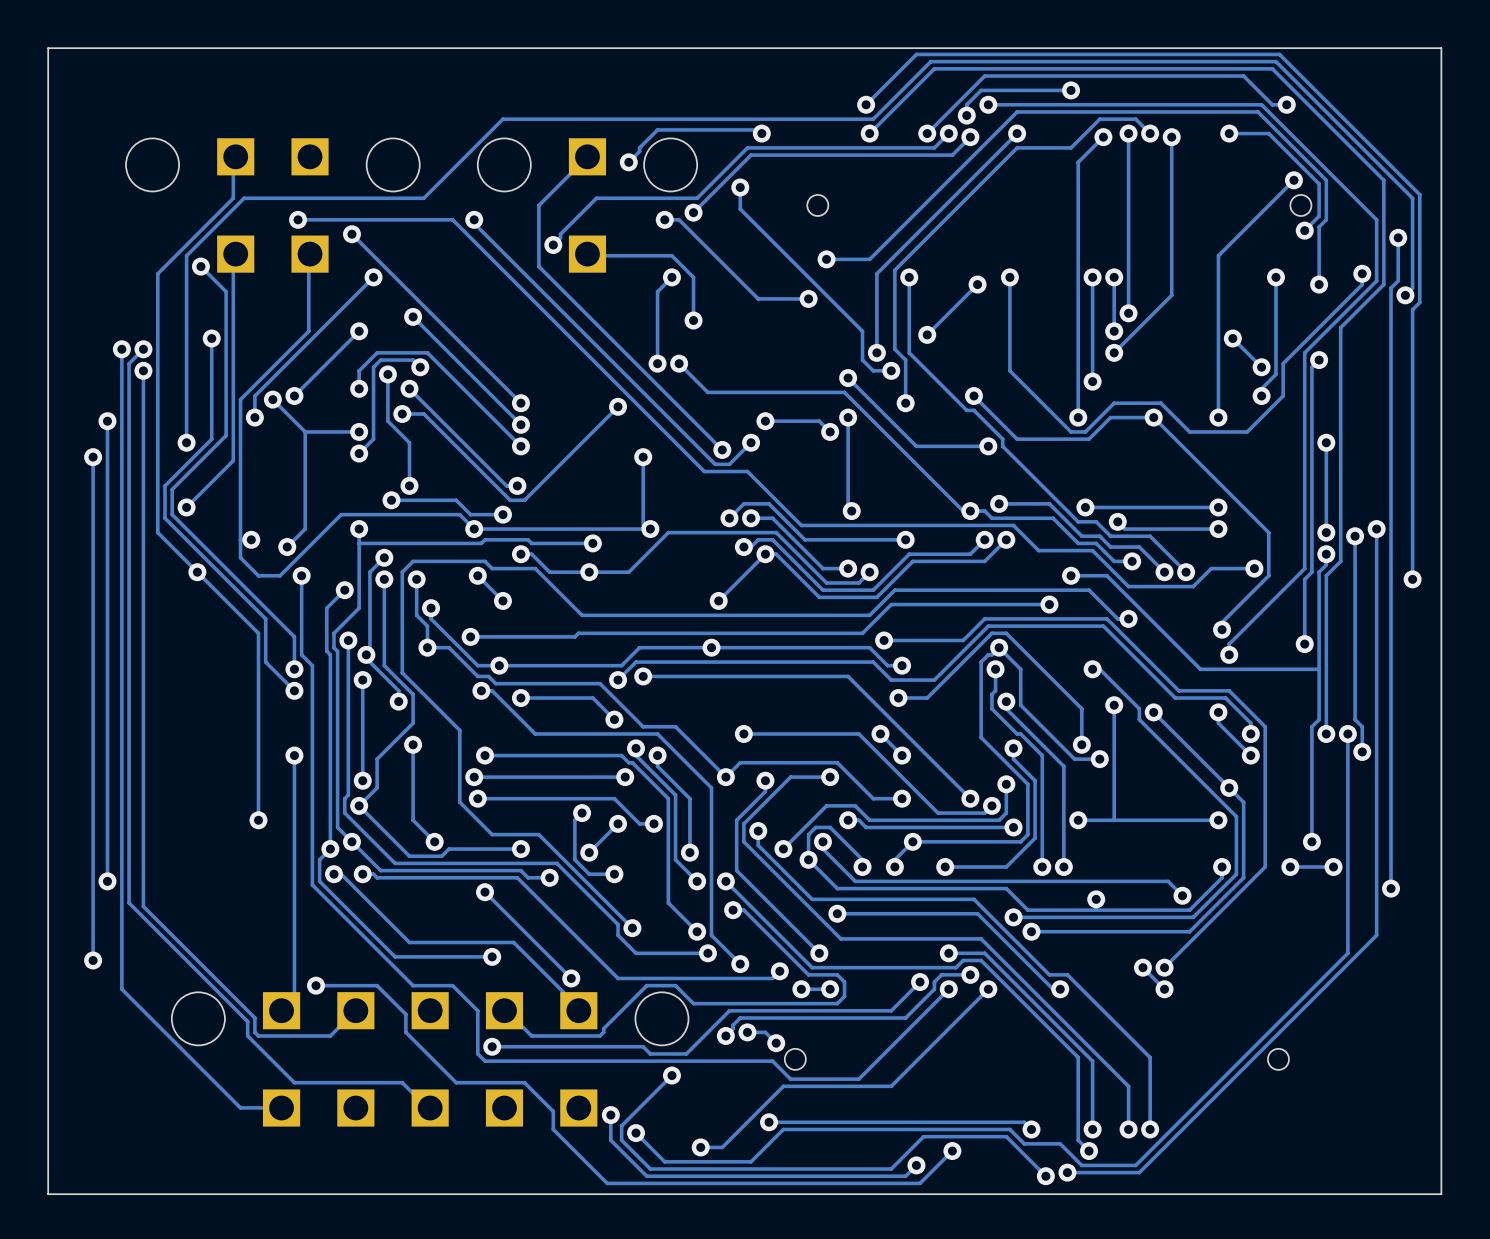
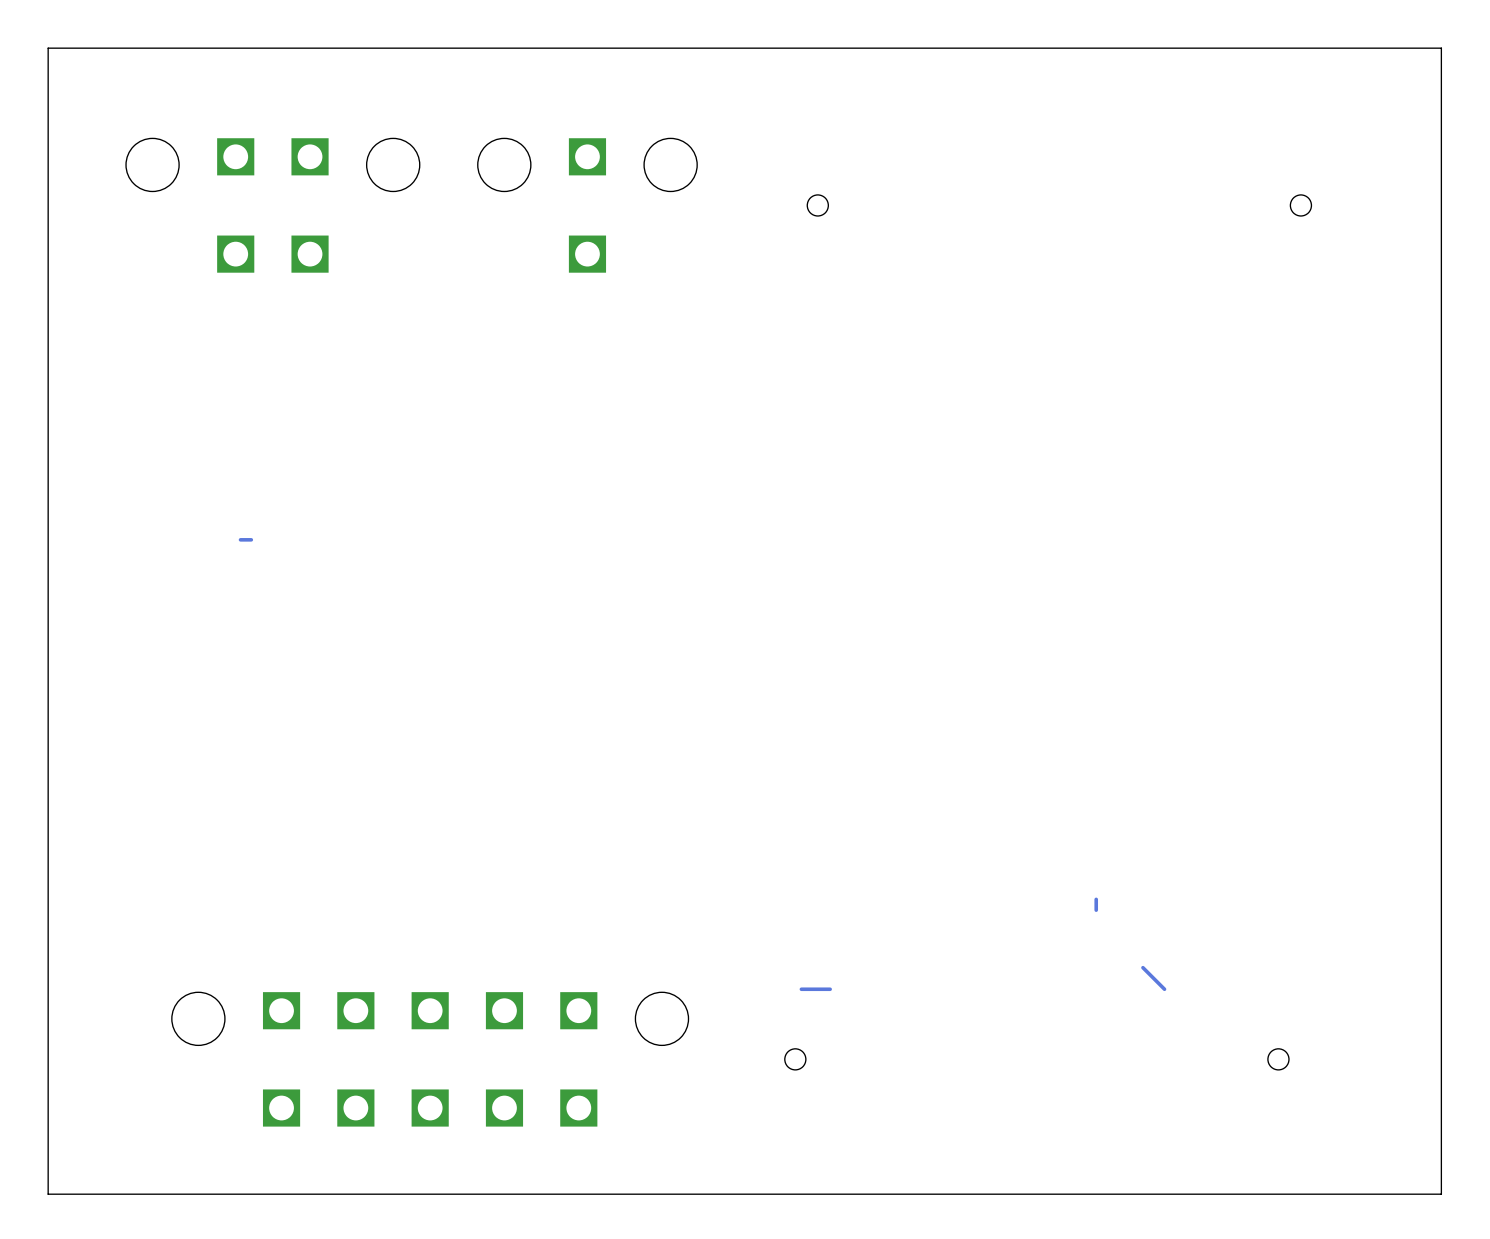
track: (1071, 90) (981, 90) (966, 104) (966, 115) -> none
via: (1071, 90) -> none
track: (866, 104) (916, 54) (1279, 54) (1419, 194) (1419, 302) (1412, 309) (1412, 579) -> none
via: (866, 104) -> none
track: (988, 104) (1261, 104) (1376, 219) (1376, 280) (1304, 352) (1304, 568) (1229, 644) (1229, 654) -> none
via: (988, 104) -> none
track: (1286, 104) (1272, 104) (1243, 76) (984, 76) (927, 133) -> none
via: (1286, 104) -> none
via: (966, 115) -> none
track: (761, 133) (758, 129) (657, 129) (628, 162) -> none
via: (761, 133) -> none
track: (869, 133) (934, 68) (1272, 68) (1383, 180) (1383, 284) (1340, 327) (1340, 561) (1326, 575) (1326, 733) -> none
via: (869, 133) -> none
via: (927, 133) -> none
track: (948, 133) (934, 147) (747, 147) (697, 198) (596, 198) (560, 234) (560, 237) (553, 245) -> none
via: (948, 133) -> none
track: (1017, 133) (876, 273) (876, 352) -> none
via: (1017, 133) -> none
track: (1128, 133) (1128, 313) -> none
via: (1128, 133) -> none
track: (1150, 133) (1135, 119) (1099, 119) (1071, 147) (1017, 147) (894, 270) (894, 349) (905, 360) (905, 403) -> none
via: (1150, 133) -> none
track: (1229, 133) (1268, 133) (1319, 183) (1319, 216) (1304, 230) -> none
via: (1229, 133) -> none
track: (970, 137) (952, 155) (751, 155) (693, 212) -> none
via: (970, 137) -> none
track: (1103, 137) (1078, 162) (1078, 417) -> none
via: (1103, 137) -> none
track: (1171, 137) (1171, 295) (1114, 352) -> none
via: (1171, 137) -> none
track: (235, 156) (233, 158) (233, 198) (157, 273) (157, 532) (258, 633) (258, 820) -> none
track: (587, 156) (538, 205) (538, 266) (722, 449) -> none
via: (628, 162) -> none
track: (1293, 180) (1218, 255) (1218, 417) -> none
via: (1293, 180) -> none
track: (740, 187) (740, 209) (862, 331) (862, 360) (873, 370) (891, 370) -> none
via: (740, 187) -> none
via: (693, 212) -> none
track: (298, 219) (452, 219) (704, 471) (747, 471) (801, 525) (1013, 525) (1038, 550) (1092, 550) (1128, 586) (1193, 586) (1211, 568) (1254, 568) -> none
via: (298, 219) -> none
track: (474, 219) (474, 223) (715, 464) (729, 464) (751, 442) -> none
via: (474, 219) -> none
track: (664, 219) (679, 219) (758, 298) (808, 298) -> none
via: (664, 219) -> none
via: (1304, 230) -> none
track: (351, 234) (520, 403) -> none
via: (351, 234) -> none
track: (1398, 237) (1398, 280) (1391, 288) (1391, 888) -> none
via: (1398, 237) -> none
via: (553, 245) -> none
track: (235, 254) (233, 255) (233, 460) (186, 507) -> none
track: (310, 254) (308, 331) (240, 399) (240, 557) (258, 575) (280, 575) (341, 514) (459, 514) (474, 529) (650, 529) -> none
track: (587, 254) (589, 255) (671, 255) (693, 277) (693, 320) -> none
track: (826, 259) (869, 259) (1017, 111) (1258, 111) (1326, 180) (1326, 219) (1319, 227) (1319, 284) -> none
via: (826, 259) -> none
track: (200, 266) (226, 291) (226, 435) (172, 489) (172, 514) (294, 636) (294, 669) -> none
via: (200, 266) -> none
track: (1362, 273) (1362, 284) (1283, 363) (1283, 396) (1247, 431) (1189, 431) (1160, 403) (1114, 403) (1085, 431) (1071, 431) (1009, 370) (1009, 277) -> none
via: (1362, 273) -> none
track: (373, 277) (254, 396) (254, 417) -> none
via: (373, 277) -> none
track: (671, 277) (657, 291) (657, 363) -> none
via: (671, 277) -> none
track: (909, 277) (909, 352) (966, 410) (973, 410) (1002, 439) (1002, 446) (1078, 521) (1096, 521) (1110, 536) (1150, 536) (1186, 572) -> none
via: (909, 277) -> none
via: (1009, 277) -> none
track: (1092, 277) (1092, 381) -> none
via: (1092, 277) -> none
track: (1114, 277) (1114, 331) -> none
via: (1114, 277) -> none
track: (1275, 277) (1275, 374) (1261, 388) (1261, 396) -> none
via: (1275, 277) -> none
track: (977, 284) (927, 334) -> none
via: (977, 284) -> none
via: (1319, 284) -> none
track: (1405, 295) (1412, 288) (1412, 198) (1275, 61) (930, 61) (873, 119) (502, 119) (423, 198) (244, 198) (186, 255) (186, 442) -> none
via: (1405, 295) -> none
via: (808, 298) -> none
via: (1128, 313) -> none
track: (413, 316) (520, 424) -> none
via: (413, 316) -> none
via: (693, 320) -> none
track: (359, 331) (294, 396) -> none
via: (359, 331) -> none
via: (1114, 331) -> none
via: (927, 334) -> none
track: (211, 338) (211, 439) (165, 485) (165, 518) (265, 618) (265, 662) (294, 690) -> none
via: (211, 338) -> none
track: (1232, 338) (1261, 367) -> none
via: (1232, 338) -> none
track: (121, 349) (121, 989) (240, 1107) (281, 1108) -> none
via: (121, 349) -> none
track: (143, 349) (129, 363) (129, 902) (247, 1021) (247, 1035) (294, 1082) (402, 1082) (427, 1107) (430, 1108) -> none
via: (143, 349) -> none
via: (876, 352) -> none
via: (1114, 352) -> none
track: (1319, 360) (1311, 367) (1311, 572) (1304, 579) (1304, 644) -> none
via: (1319, 360) -> none
via: (657, 363) -> none
track: (679, 363) (707, 392) (844, 392) (963, 511) (984, 511) (991, 518) (1053, 518) (1078, 543) (1096, 543) (1114, 561) (1132, 561) -> none
via: (679, 363) -> none
track: (420, 367) (413, 360) (380, 360) (373, 367) (373, 439) (359, 453) -> none
via: (420, 367) -> none
via: (1261, 367) -> none
track: (143, 370) (143, 906) (254, 1018) (254, 1032) (258, 1035) (330, 1035) (355, 1010) -> none
via: (143, 370) -> none
via: (891, 370) -> none
track: (387, 374) (387, 421) (409, 442) (409, 485) -> none
via: (387, 374) -> none
track: (848, 378) (916, 446) (988, 446) -> none
via: (848, 378) -> none
via: (1092, 381) -> none
track: (359, 388) (359, 370) (377, 352) (427, 352) (520, 446) -> none
via: (359, 388) -> none
track: (409, 388) (506, 485) (517, 485) -> none
via: (409, 388) -> none
via: (294, 396) -> none
track: (973, 396) (1017, 439) (1089, 439) (1110, 417) (1153, 417) (1268, 532) (1268, 575) (1222, 622) (1222, 629) -> none
via: (973, 396) -> none
via: (1261, 396) -> none
track: (272, 399) (305, 431) -> none
via: (272, 399) -> none
via: (520, 403) -> none
via: (905, 403) -> none
track: (618, 406) (524, 500) (510, 500) (423, 413) (402, 413) -> none
via: (618, 406) -> none
via: (402, 413) -> none
via: (254, 417) -> none
track: (848, 417) (848, 507) (851, 511) -> none
via: (848, 417) -> none
via: (1078, 417) -> none
via: (1153, 417) -> none
via: (1218, 417) -> none
track: (107, 421) (107, 881) -> none
via: (107, 421) -> none
track: (765, 421) (819, 421) (830, 431) -> none
via: (765, 421) -> none
via: (520, 424) -> none
track: (305, 431) (305, 529) (287, 547) -> none
track: (359, 431) (305, 431) -> none
via: (359, 431) -> none
via: (830, 431) -> none
via: (186, 442) -> none
via: (751, 442) -> none
track: (1326, 442) (1326, 532) -> none
via: (1326, 442) -> none
via: (520, 446) -> none
via: (988, 446) -> none
via: (722, 449) -> none
via: (359, 453) -> none
track: (93, 457) (93, 960) -> none
via: (93, 457) -> none
track: (643, 457) (643, 529) -> none
via: (643, 457) -> none
via: (409, 485) -> none
via: (517, 485) -> none
track: (391, 500) (456, 500) (470, 514) (502, 514) -> none
via: (391, 500) -> none
track: (999, 503) (1049, 503) (1081, 536) (1099, 536) (1110, 547) (1139, 547) (1164, 572) -> none
via: (999, 503) -> none
via: (186, 507) -> none
via: (1085, 507) -> none
track: (1218, 507) (1085, 507) -> none
via: (1218, 507) -> none
via: (851, 511) -> none
via: (970, 511) -> none
via: (502, 514) -> none
track: (729, 518) (743, 503) (769, 503) (804, 539) (905, 539) -> none
via: (729, 518) -> none
track: (751, 518) (772, 518) (822, 568) (848, 568) -> none
via: (751, 518) -> none
track: (1117, 521) (1124, 529) (1218, 529) -> none
via: (1117, 521) -> none
track: (359, 529) (359, 608) (333, 633) (333, 647) (337, 651) (337, 827) (380, 870) (520, 870) (528, 877) (549, 877) -> none
via: (359, 529) -> none
via: (474, 529) -> none
via: (650, 529) -> none
via: (1218, 529) -> none
track: (1376, 529) (1376, 935) (1139, 1172) (1067, 1172) -> none
via: (1376, 529) -> none
via: (1326, 532) -> none
track: (1355, 536) (1355, 719) (1362, 726) (1362, 751) -> none
via: (1355, 536) -> none
via: (251, 539) -> none
via: (905, 539) -> none
track: (984, 539) (970, 554) (909, 554) (873, 590) (822, 590) (772, 539) (758, 539) (751, 547) (743, 547) -> none
via: (984, 539) -> none
track: (1006, 539) (984, 561) (912, 561) (876, 597) (819, 597) (776, 554) (765, 554) (718, 600) -> none
via: (1006, 539) -> none
track: (592, 543) (531, 543) (528, 539) (485, 539) (481, 543) (359, 543) -> none
via: (592, 543) -> none
via: (287, 547) -> none
via: (743, 547) -> none
track: (520, 554) (531, 554) (549, 572) (628, 572) (668, 532) (776, 532) (826, 582) (858, 582) (869, 572) -> none
via: (520, 554) -> none
via: (765, 554) -> none
track: (1326, 554) (1326, 565) (1319, 572) (1319, 719) (1311, 726) (1311, 841) -> none
via: (1326, 554) -> none
track: (384, 557) (369, 572) (369, 662) (398, 690) (398, 701) -> none
via: (384, 557) -> none
via: (1132, 561) -> none
via: (848, 568) -> none
via: (1254, 568) -> none
via: (197, 572) -> none
via: (589, 572) -> none
via: (869, 572) -> none
via: (1164, 572) -> none
via: (1186, 572) -> none
track: (301, 575) (301, 654) (312, 665) (312, 884) (413, 985) (452, 985) (477, 1010) (477, 1053) (485, 1061) (772, 1061) (790, 1079) (858, 1079) (948, 989) -> none
via: (301, 575) -> none
track: (477, 575) (502, 600) -> none
via: (477, 575) -> none
track: (1071, 575) (1107, 575) (1200, 669) (1319, 669) -> none
via: (1071, 575) -> none
track: (384, 579) (384, 665) (413, 694) (413, 723) (377, 759) (377, 787) (359, 805) (409, 856) (441, 856) (449, 849) (520, 849) -> none
via: (384, 579) -> none
track: (416, 579) (416, 615) (427, 626) (427, 647) (449, 647) (477, 676) (488, 676) (495, 683) (600, 683) (643, 726) (675, 726) (725, 777) (740, 762) (837, 762) (873, 798) (902, 798) -> none
via: (416, 579) -> none
via: (1412, 579) -> none
track: (344, 590) (326, 608) (326, 651) (330, 654) (330, 849) (319, 859) (319, 881) (395, 956) (492, 956) -> none
via: (344, 590) -> none
via: (502, 600) -> none
via: (718, 600) -> none
track: (1049, 604) (891, 604) (862, 633) (578, 633) (574, 636) (470, 636) -> none
via: (1049, 604) -> none
track: (431, 608) (431, 618) (477, 665) (621, 665) (639, 647) (869, 647) (887, 665) (902, 665) -> none
via: (431, 608) -> none
track: (1128, 618) (1117, 618) (1089, 590) (894, 590) (869, 615) (582, 615) (535, 568) (492, 568) (485, 561) (413, 561) (402, 572) (402, 672) (459, 730) (459, 802) (492, 834) (538, 834) (632, 928) -> none
via: (1128, 618) -> none
via: (1222, 629) -> none
via: (470, 636) -> none
track: (348, 640) (348, 795) (344, 798) (344, 813) (395, 863) (556, 863) (618, 924) (618, 935) (636, 953) (707, 953) -> none
via: (348, 640) -> none
track: (884, 640) (963, 640) (984, 618) (1107, 618) (1178, 690) (1229, 690) (1265, 726) (1265, 867) (1164, 967) -> none
via: (884, 640) -> none
via: (1304, 644) -> none
via: (427, 647) -> none
via: (711, 647) -> none
via: (999, 647) -> none
via: (366, 654) -> none
via: (1229, 654) -> none
via: (499, 665) -> none
via: (902, 665) -> none
via: (294, 669) -> none
track: (995, 669) (995, 690) (991, 694) (991, 708) (1042, 755) (1042, 867) -> none
via: (995, 669) -> none
track: (1092, 669) (1099, 669) (1139, 708) (1139, 719) (1236, 816) (1236, 874) (1193, 917) (1013, 917) -> none
via: (1092, 669) -> none
track: (643, 676) (848, 676) (970, 798) -> none
via: (643, 676) -> none
track: (362, 680) (362, 780) -> none
via: (362, 680) -> none
track: (618, 680) (636, 662) (873, 662) (891, 680) (934, 680) (988, 626) (1103, 626) (1175, 698) (1225, 698) (1250, 723) (1250, 733) -> none
via: (618, 680) -> none
via: (294, 690) -> none
track: (481, 690) (492, 690) (535, 733) (657, 733) (711, 787) (711, 935) (740, 964) -> none
via: (481, 690) -> none
track: (520, 698) (592, 698) (614, 719) -> none
via: (520, 698) -> none
track: (898, 698) (927, 698) (991, 633) (1006, 633) (1081, 708) (1081, 744) -> none
via: (898, 698) -> none
via: (398, 701) -> none
track: (1006, 701) (1006, 708) (1063, 766) (1063, 867) -> none
via: (1006, 701) -> none
track: (1114, 705) (1114, 820) -> none
via: (1114, 705) -> none
track: (1153, 712) (1243, 802) (1243, 877) (1189, 931) (1031, 931) -> none
via: (1153, 712) -> none
track: (1218, 712) (1218, 723) (1250, 755) -> none
via: (1218, 712) -> none
via: (614, 719) -> none
track: (743, 733) (858, 733) (938, 813) (984, 813) (991, 805) -> none
via: (743, 733) -> none
track: (880, 733) (902, 755) -> none
via: (880, 733) -> none
via: (1250, 733) -> none
via: (1326, 733) -> none
track: (1347, 733) (1347, 953) (1135, 1165) (1081, 1165) (1060, 1143) (1024, 1143) (1009, 1129) (783, 1129) (751, 1161) (664, 1161) (636, 1133) -> none
via: (1347, 733) -> none
track: (413, 744) (413, 820) (434, 841) -> none
via: (413, 744) -> none
via: (1081, 744) -> none
track: (636, 748) (636, 755) (675, 795) (675, 859) (697, 881) -> none
via: (636, 748) -> none
track: (1013, 748) (1013, 759) (1035, 780) (1035, 838) (1006, 867) (945, 867) -> none
via: (1013, 748) -> none
via: (1362, 751) -> none
track: (294, 755) (294, 996) (281, 1010) -> none
via: (294, 755) -> none
track: (485, 755) (621, 755) (628, 762) (632, 762) (668, 798) (668, 902) (697, 931) -> none
via: (485, 755) -> none
track: (657, 755) (657, 766) (689, 798) (689, 852) -> none
via: (657, 755) -> none
via: (902, 755) -> none
via: (1250, 755) -> none
track: (1099, 759) (1074, 759) (1020, 705) (1020, 669) (999, 647) (981, 662) (981, 737) (1027, 784) (1027, 834) (1020, 841) (912, 841) (894, 859) (894, 867) -> none
via: (1099, 759) -> none
via: (474, 777) -> none
track: (625, 777) (474, 777) -> none
via: (625, 777) -> none
via: (725, 777) -> none
track: (830, 777) (790, 777) (743, 823) (743, 841) (840, 938) (981, 938) (1128, 1086) (1128, 1129) -> none
via: (830, 777) -> none
via: (362, 780) -> none
track: (765, 780) (765, 791) (736, 820) (736, 870) (819, 953) -> none
via: (765, 780) -> none
track: (1006, 784) (1006, 813) (999, 820) (869, 820) (855, 805) (826, 805) (783, 849) -> none
via: (1006, 784) -> none
via: (1229, 787) -> none
track: (477, 798) (614, 798) (639, 823) (653, 823) -> none
via: (477, 798) -> none
via: (902, 798) -> none
via: (970, 798) -> none
via: (359, 805) -> none
via: (991, 805) -> none
track: (582, 813) (574, 820) (574, 859) (589, 874) (614, 874) -> none
via: (582, 813) -> none
via: (258, 820) -> none
track: (848, 820) (858, 820) (866, 827) (1013, 827) -> none
via: (848, 820) -> none
via: (1078, 820) -> none
track: (1218, 820) (1078, 820) -> none
via: (1218, 820) -> none
track: (618, 823) (589, 852) -> none
via: (618, 823) -> none
via: (653, 823) -> none
via: (1013, 827) -> none
track: (758, 831) (758, 845) (812, 899) (973, 899) (1049, 974) (1067, 974) (1150, 1057) (1150, 1129) -> none
via: (758, 831) -> none
via: (351, 841) -> none
via: (434, 841) -> none
track: (822, 841) (822, 849) (855, 881) (1168, 881) (1182, 895) -> none
via: (822, 841) -> none
via: (912, 841) -> none
via: (1311, 841) -> none
via: (330, 849) -> none
via: (520, 849) -> none
via: (783, 849) -> none
via: (589, 852) -> none
via: (689, 852) -> none
via: (808, 859) -> none
via: (862, 867) -> none
via: (894, 867) -> none
via: (945, 867) -> none
via: (1042, 867) -> none
via: (1063, 867) -> none
track: (1222, 867) (1222, 877) (1189, 910) (1027, 910) (1006, 888) (837, 888) (808, 859) (808, 834) (815, 827) (830, 827) (862, 859) (862, 867) -> none
via: (1222, 867) -> none
via: (1290, 867) -> none
track: (1333, 867) (1290, 867) -> none
via: (1333, 867) -> none
track: (333, 874) (341, 874) (409, 942) (513, 942) (578, 1007) (578, 1010) -> none
via: (333, 874) -> none
track: (362, 874) (373, 874) (377, 877) (517, 877) (618, 978) (772, 978) (779, 971) -> none
via: (362, 874) -> none
via: (614, 874) -> none
via: (549, 877) -> none
via: (107, 881) -> none
via: (697, 881) -> none
track: (725, 881) (812, 967) (955, 967) (963, 960) (981, 960) (1078, 1057) (1078, 1140) (1089, 1151) -> none
via: (725, 881) -> none
via: (1391, 888) -> none
track: (485, 892) (571, 978) -> none
via: (485, 892) -> none
via: (1182, 895) -> none
via: (1096, 899) -> none
track: (733, 910) (743, 910) (808, 974) (837, 974) (844, 982) (844, 996) (837, 1003) (693, 1003) (675, 985) (646, 985) (603, 1028) (603, 1032) (600, 1035) (531, 1035) (504, 1010) -> none
via: (733, 910) -> none
track: (837, 913) (977, 913) (1053, 989) (1060, 989) -> none
via: (837, 913) -> none
via: (1013, 917) -> none
via: (632, 928) -> none
via: (697, 931) -> none
via: (1031, 931) -> none
via: (707, 953) -> none
via: (819, 953) -> none
track: (948, 953) (984, 953) (1092, 1061) (1092, 1129) -> none
via: (948, 953) -> none
via: (492, 956) -> none
via: (93, 960) -> none
via: (740, 964) -> none
via: (1142, 967) -> none
via: (1164, 967) -> none
via: (779, 971) -> none
track: (970, 974) (941, 974) (934, 982) (934, 989) (905, 1018) (740, 1018) (725, 1035) -> none
via: (970, 974) -> none
via: (571, 978) -> none
track: (920, 982) (891, 1010) (729, 1010) (686, 1053) (650, 1053) (643, 1046) (492, 1046) -> none
via: (920, 982) -> none
track: (316, 985) (377, 985) (405, 1014) (405, 1032) (456, 1082) (524, 1082) (553, 1111) (553, 1129) (607, 1183) (920, 1183) (952, 1151) -> none
via: (316, 985) -> none
via: (801, 989) -> none
via: (830, 989) -> none
via: (948, 989) -> none
track: (988, 989) (891, 1086) (783, 1086) (722, 1147) (700, 1147) -> none
via: (988, 989) -> none
via: (1060, 989) -> none
via: (1164, 989) -> none
track: (747, 1032) (765, 1032) (776, 1043) -> none
via: (747, 1032) -> none
via: (725, 1035) -> none
via: (776, 1043) -> none
via: (492, 1046) -> none
track: (671, 1075) (621, 1125) (621, 1140) (650, 1169) (891, 1169) (923, 1136) (1006, 1136) (1045, 1176) -> none
via: (671, 1075) -> none
track: (610, 1115) (610, 1140) (646, 1176) (905, 1176) (916, 1165) -> none
via: (610, 1115) -> none
track: (769, 1122) (1024, 1122) (1031, 1129) -> none
via: (769, 1122) -> none
via: (1031, 1129) -> none
via: (1092, 1129) -> none
via: (1128, 1129) -> none
via: (1150, 1129) -> none
via: (636, 1133) -> none
via: (700, 1147) -> none
via: (952, 1151) -> none
via: (1089, 1151) -> none
via: (916, 1165) -> none
via: (1067, 1172) -> none
via: (1045, 1176) -> none

